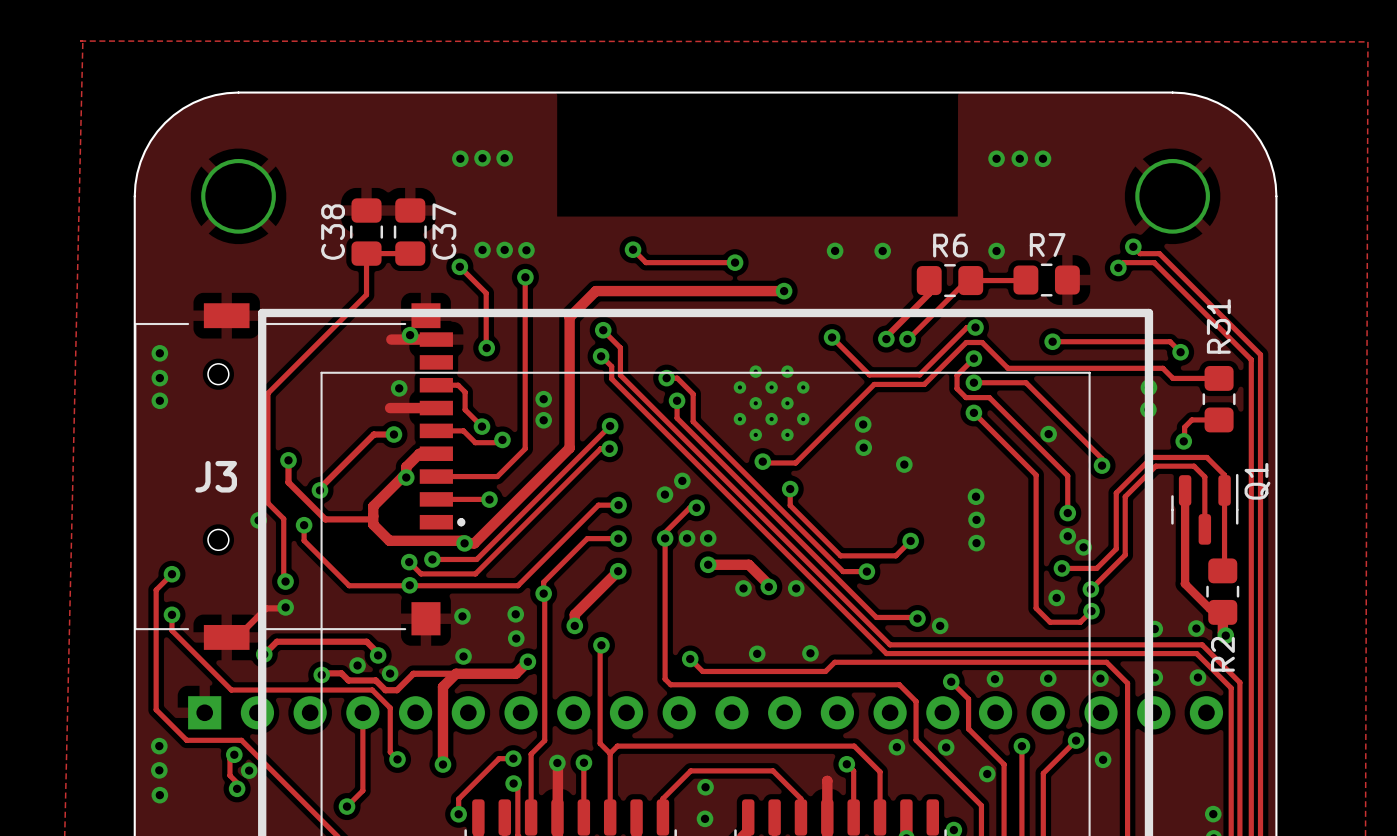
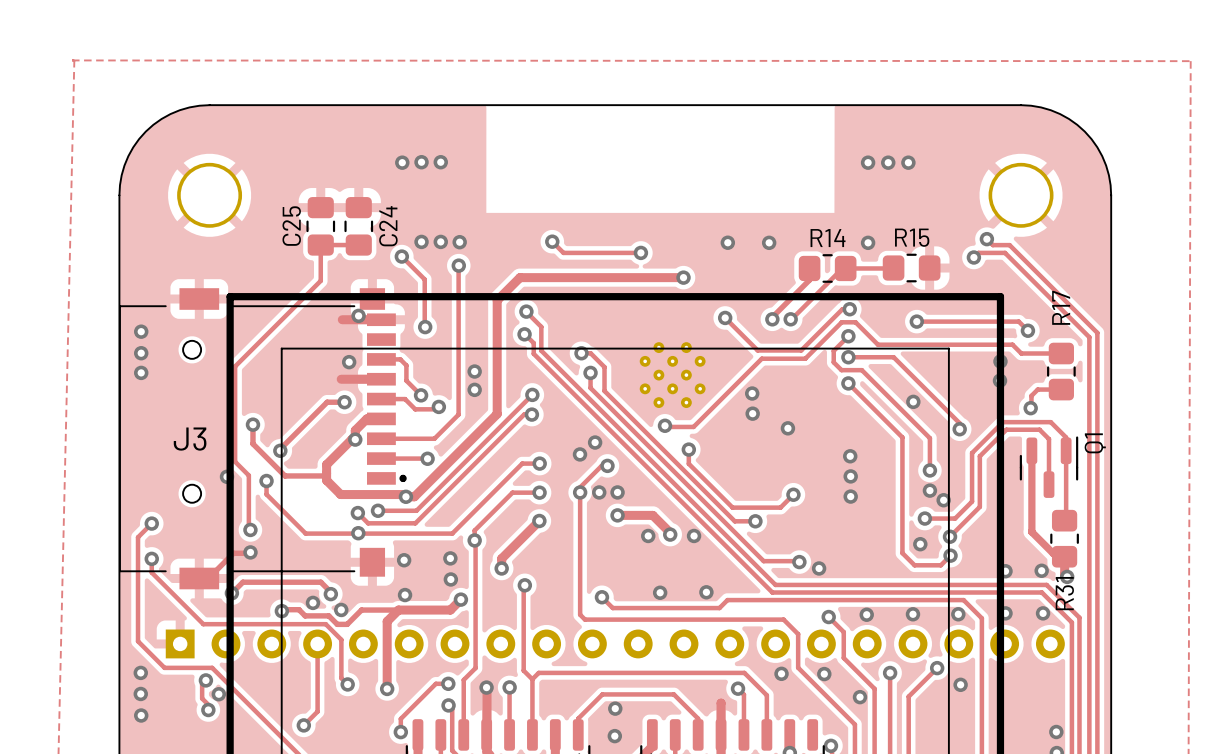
C37 name: C37 (444, 231) -> C24 (388, 226)
C38 name: C38 (333, 232) -> C25 (291, 226)
R6 name: R6 (950, 245) -> R14 (828, 238)
R7 name: R7 (1047, 245) -> R15 (912, 237)
R31 name: R31 (1218, 326) -> R17 (1061, 307)
R2 name: R2 (1222, 654) -> R31 (1064, 593)

